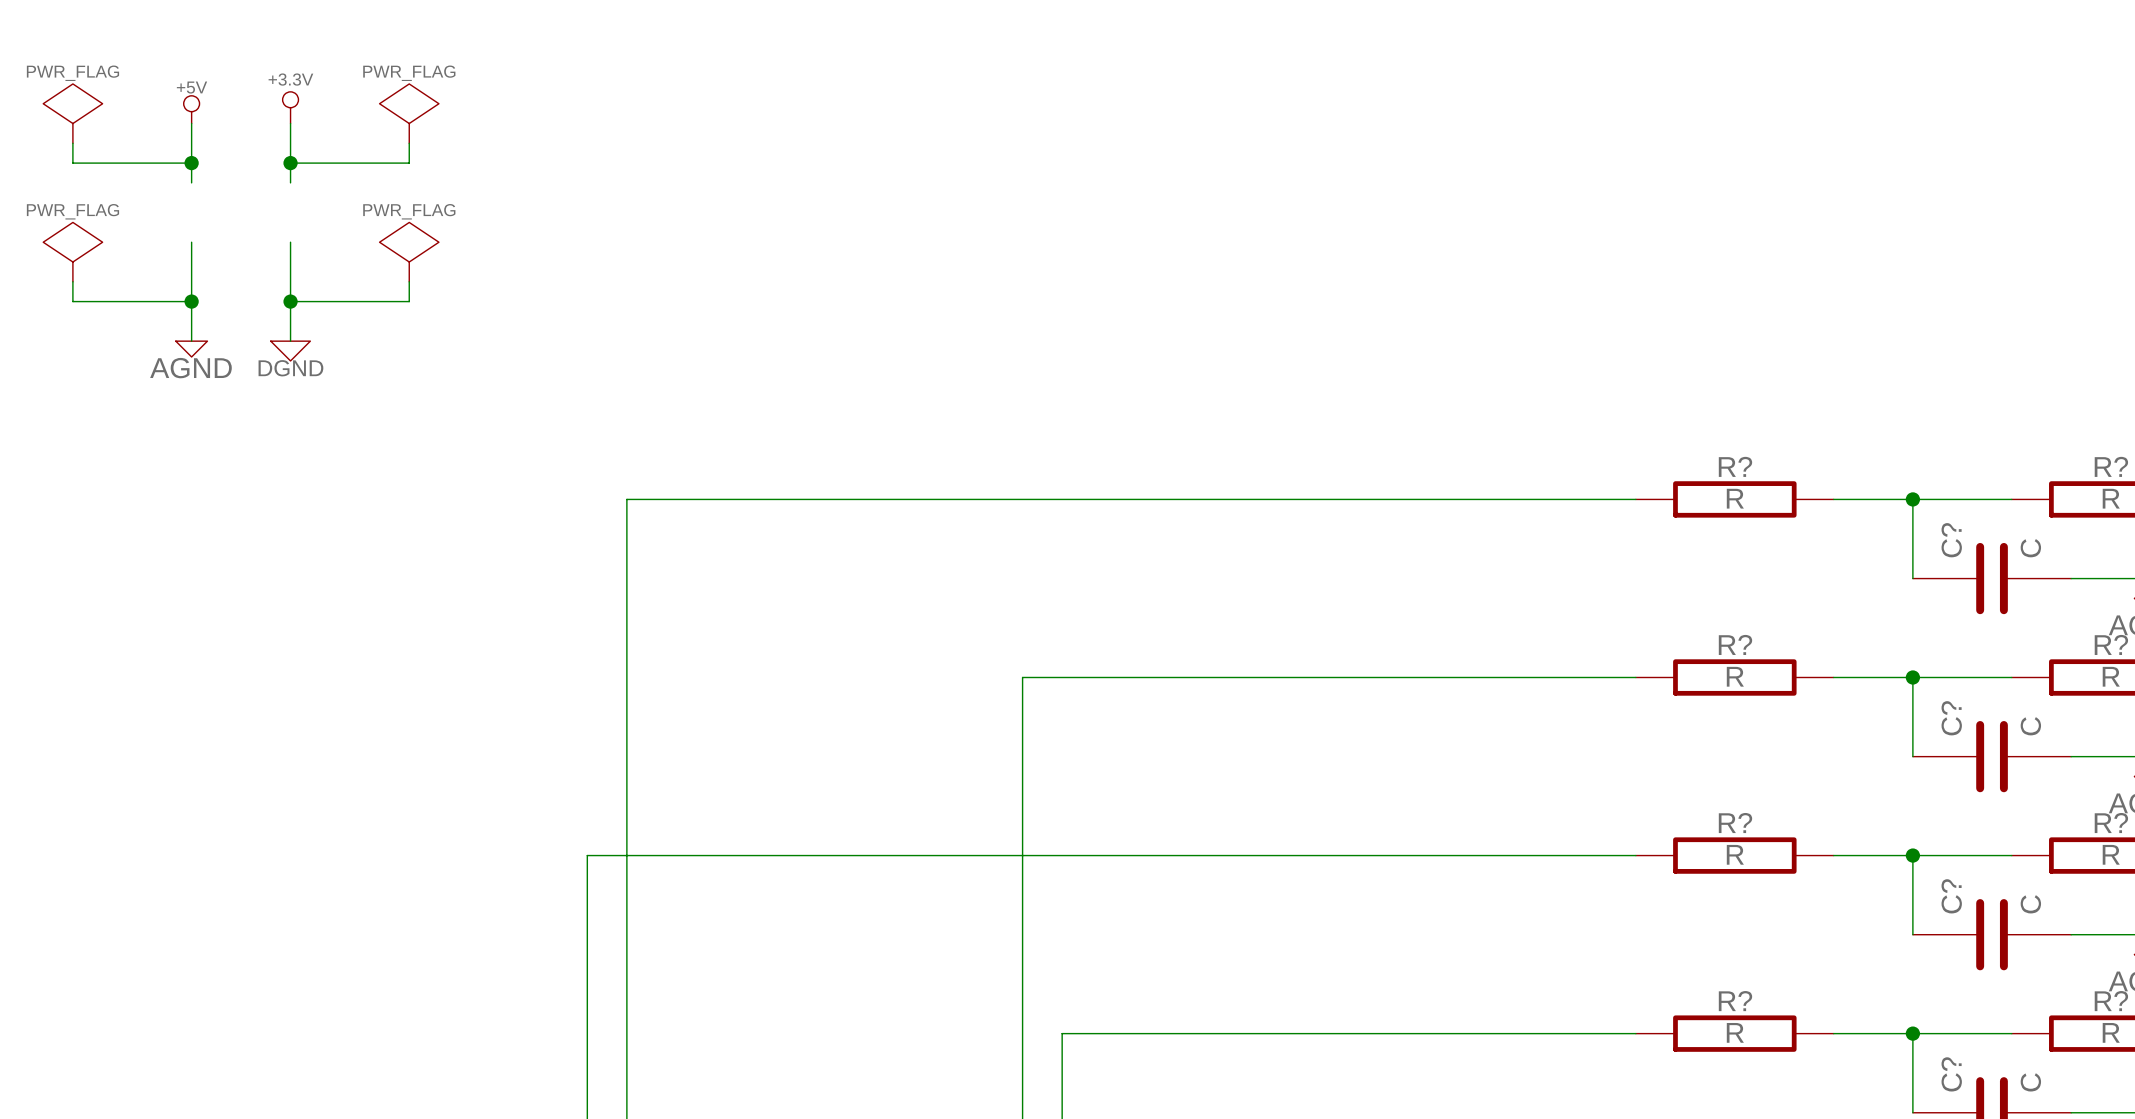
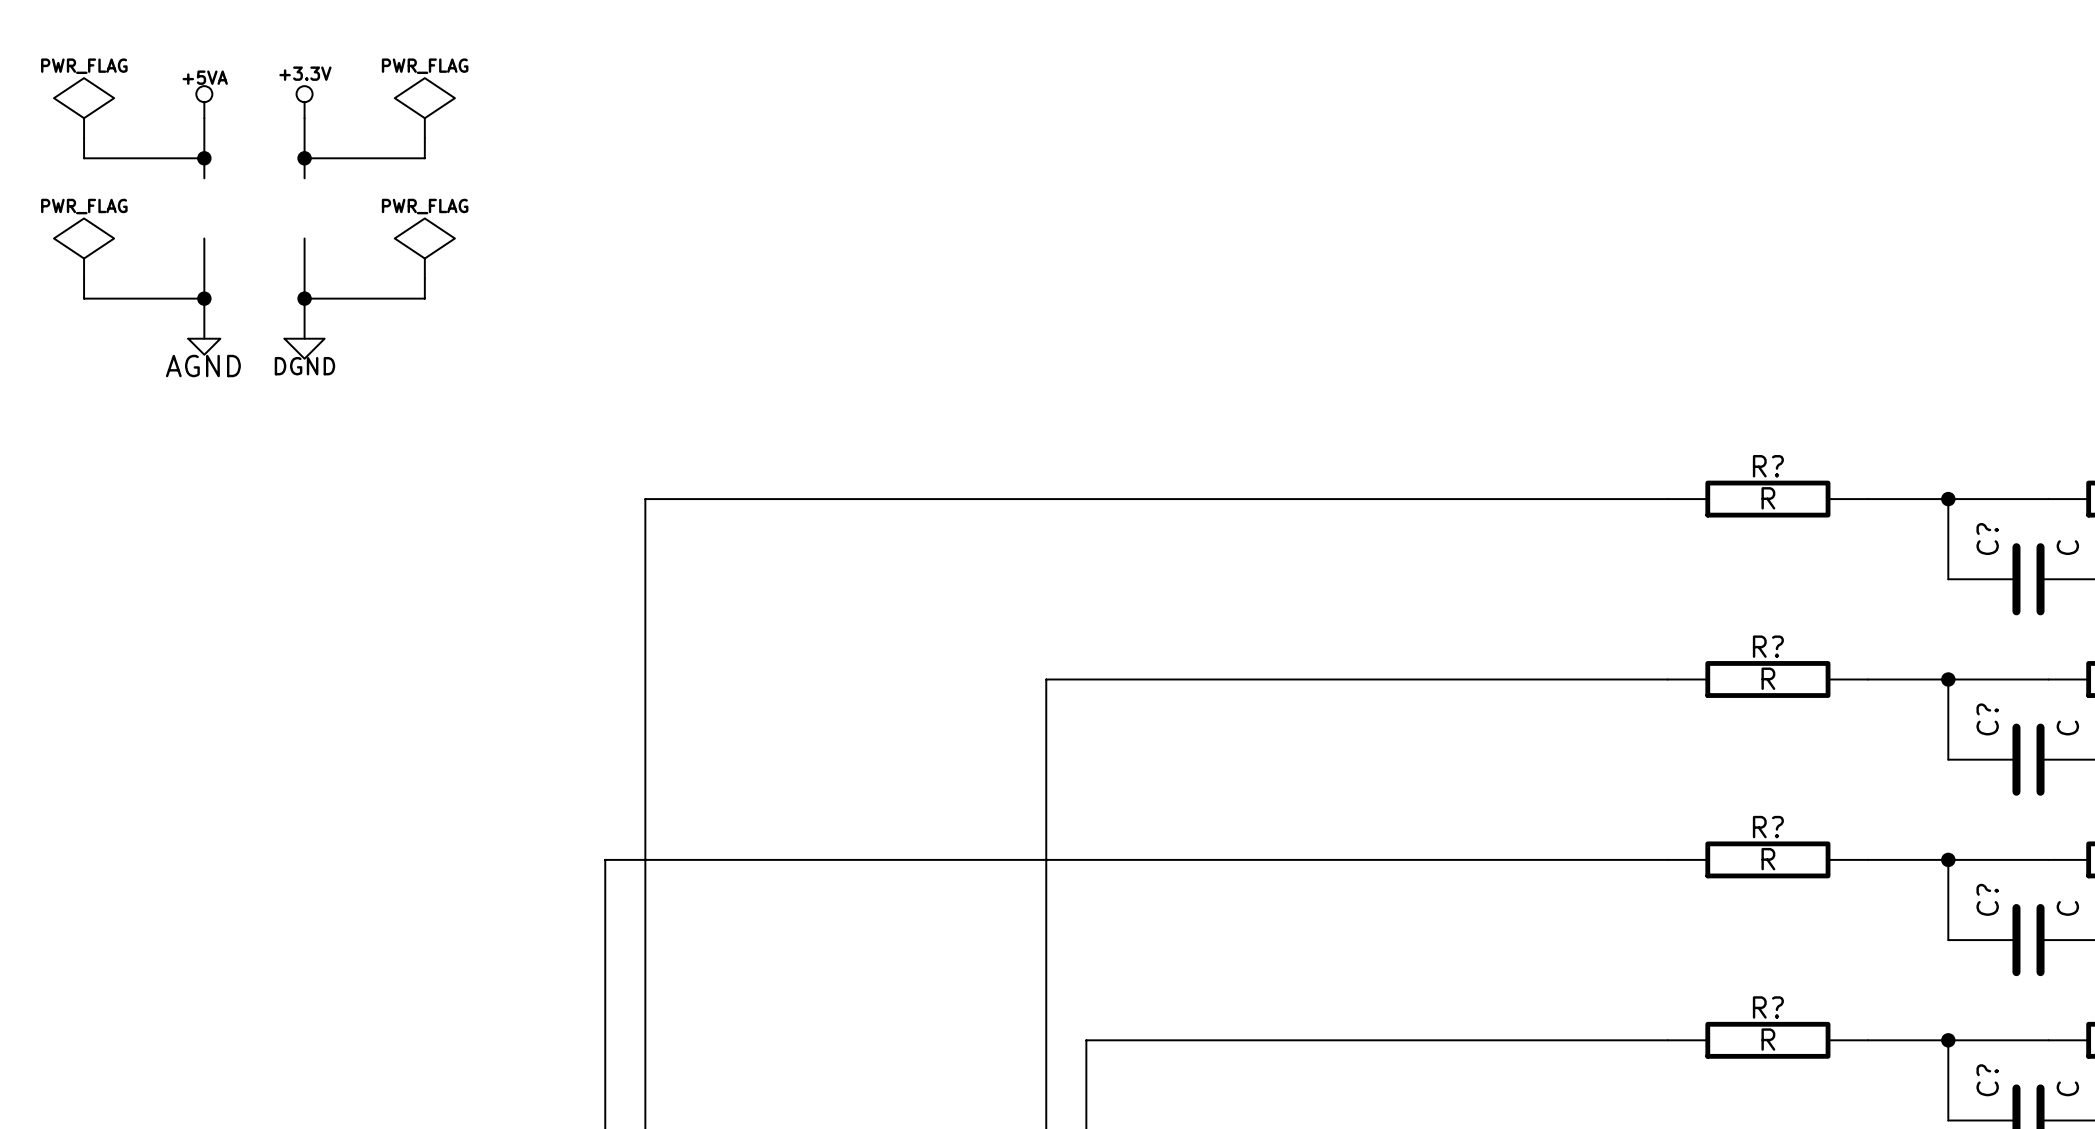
power symbol: +5V (191, 109) -> +5VA (204, 102)

